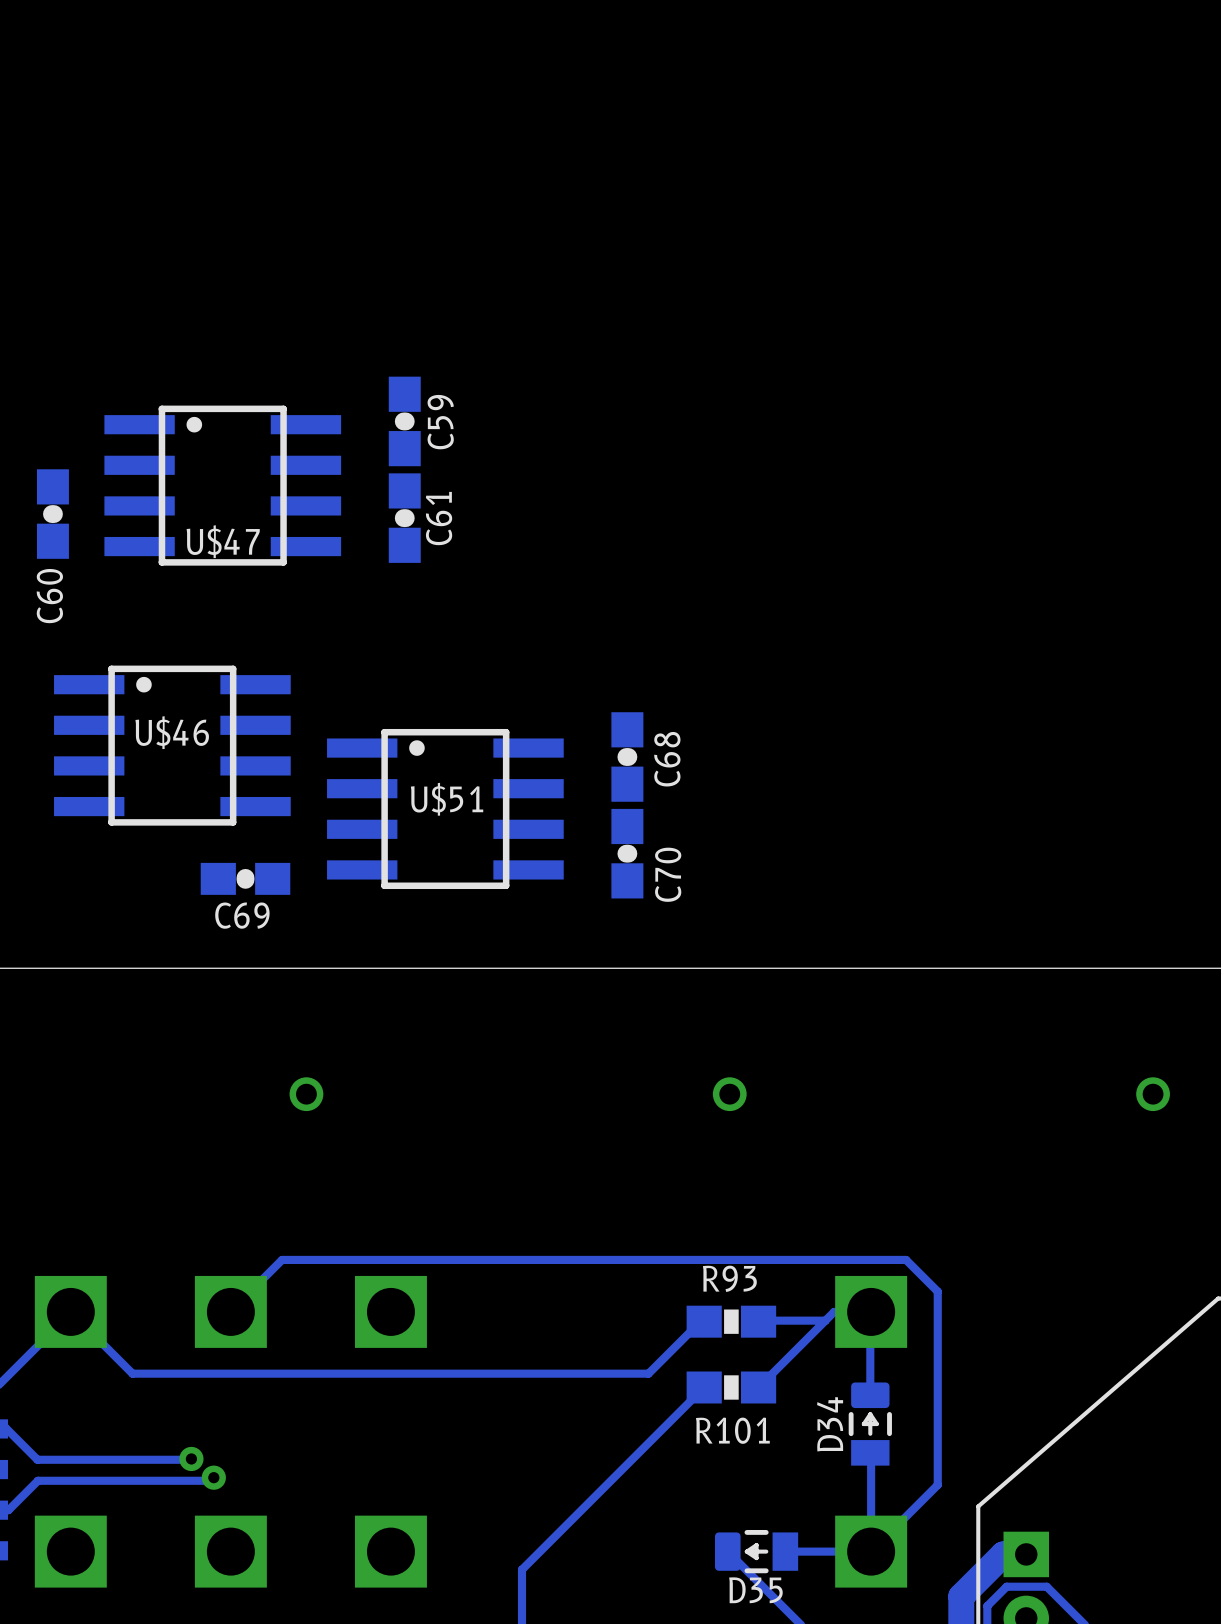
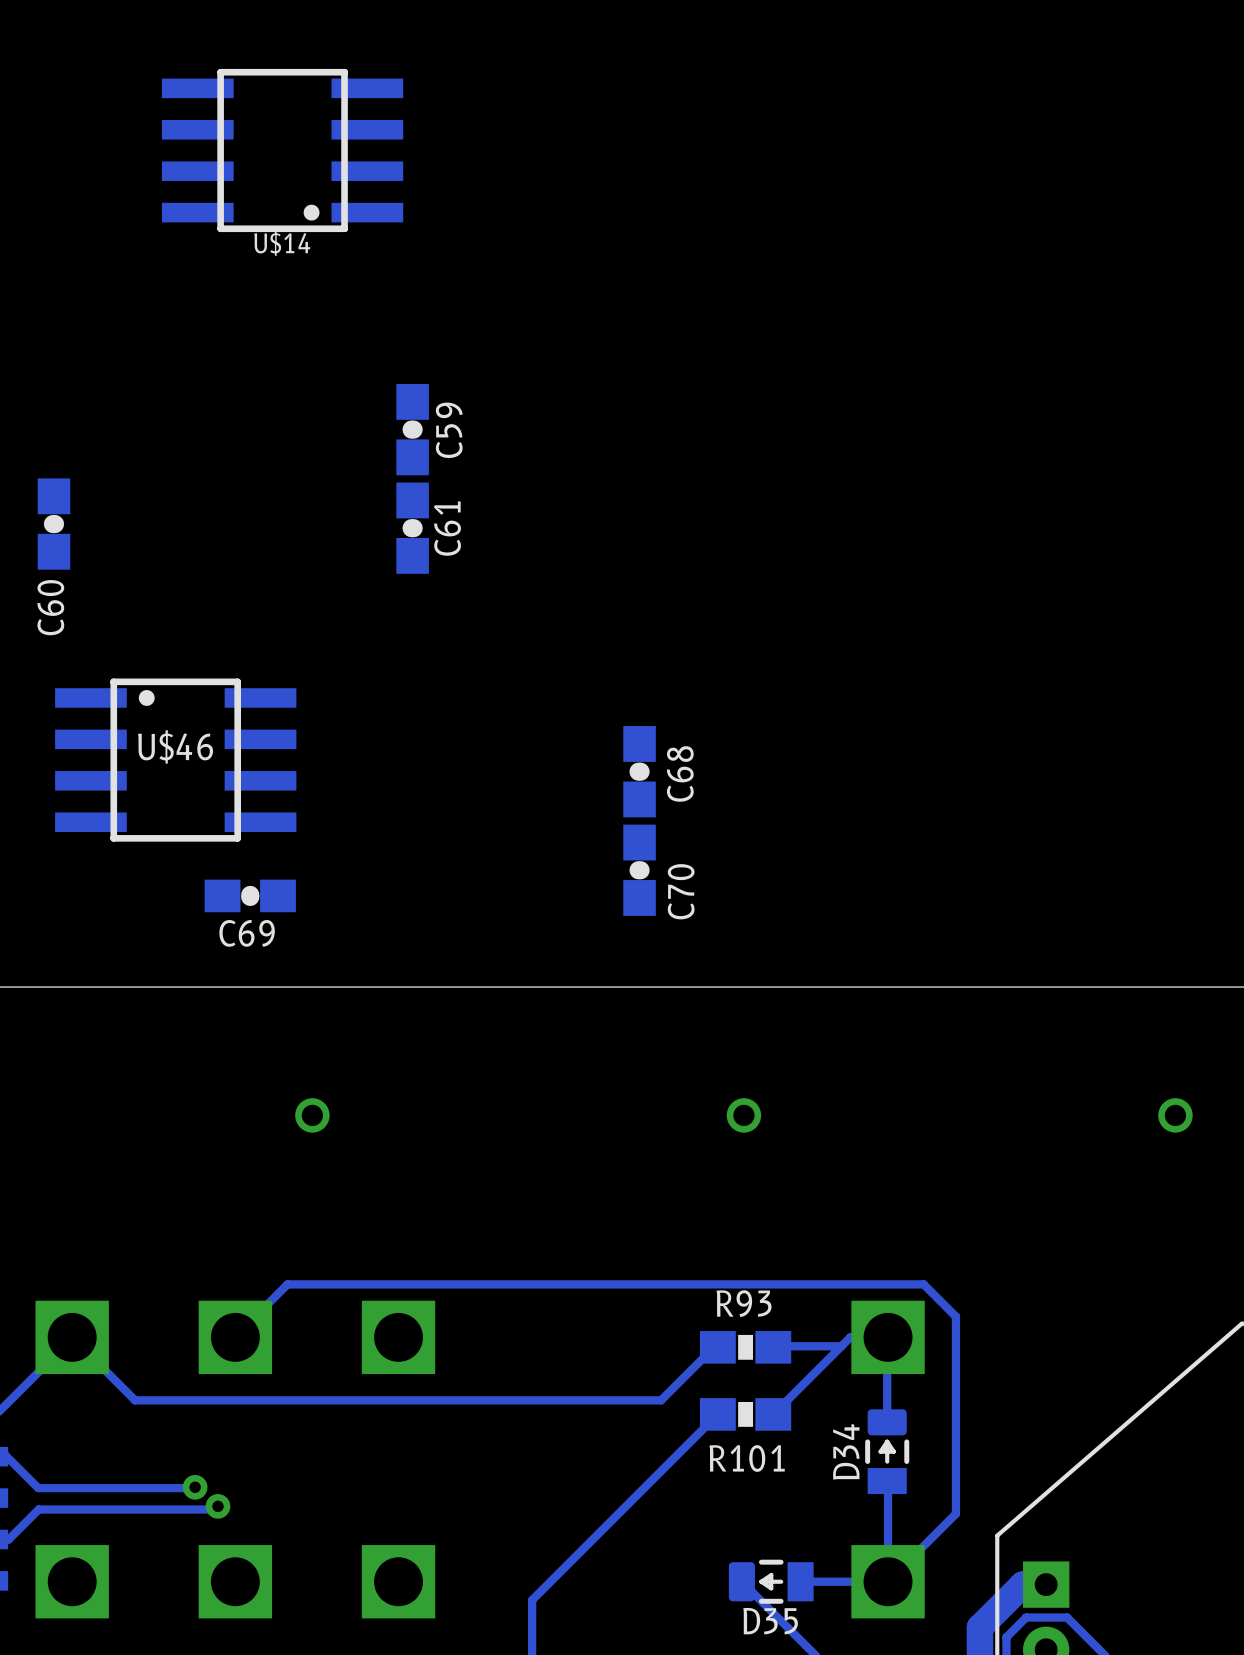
U$14: none -> (282, 150)
U$47: (222, 485) -> none
U$51: (445, 808) -> none

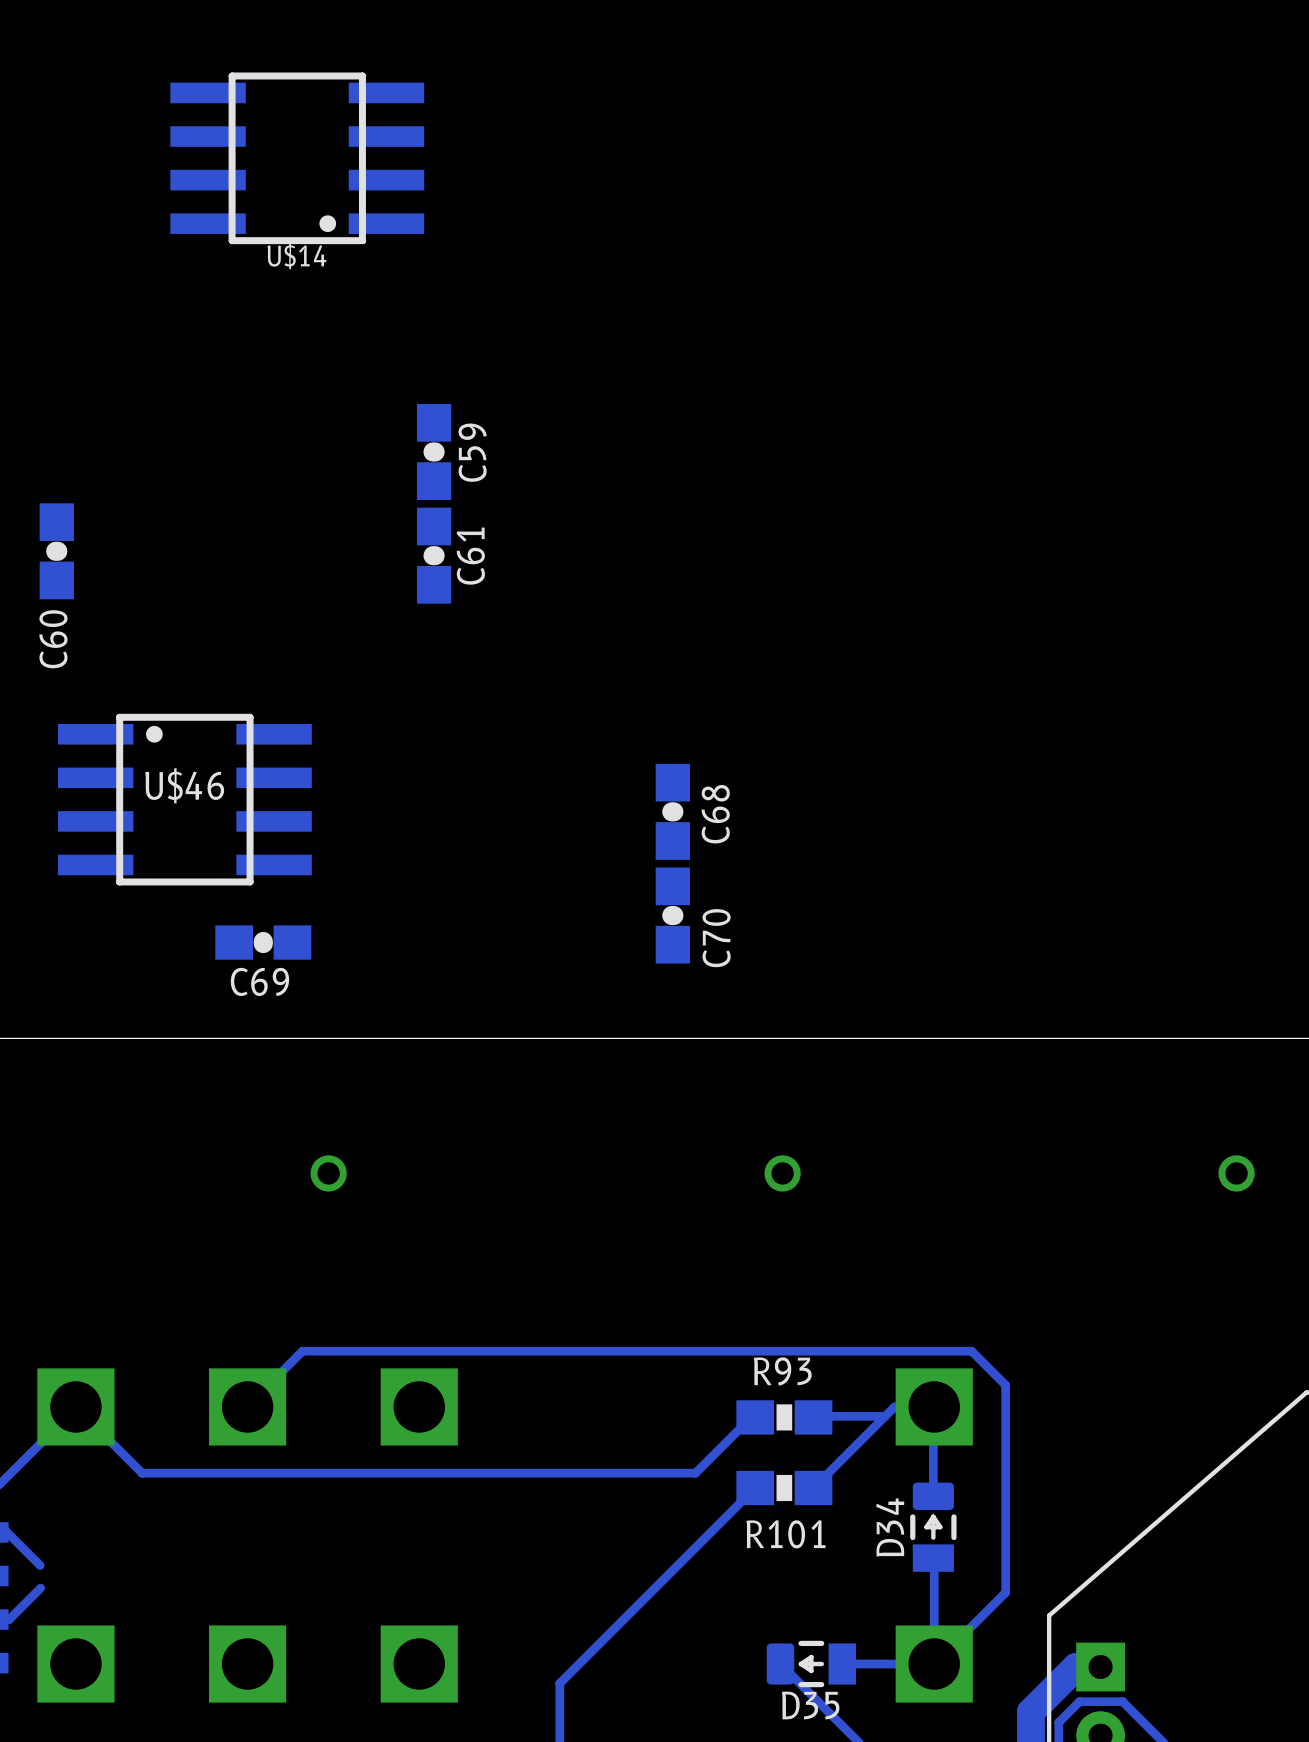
track: (195, 1487) (38, 1488) -> none
via: (195, 1487) -> none
track: (217, 1506) (214, 1509) (38, 1509) -> none
via: (217, 1506) -> none

